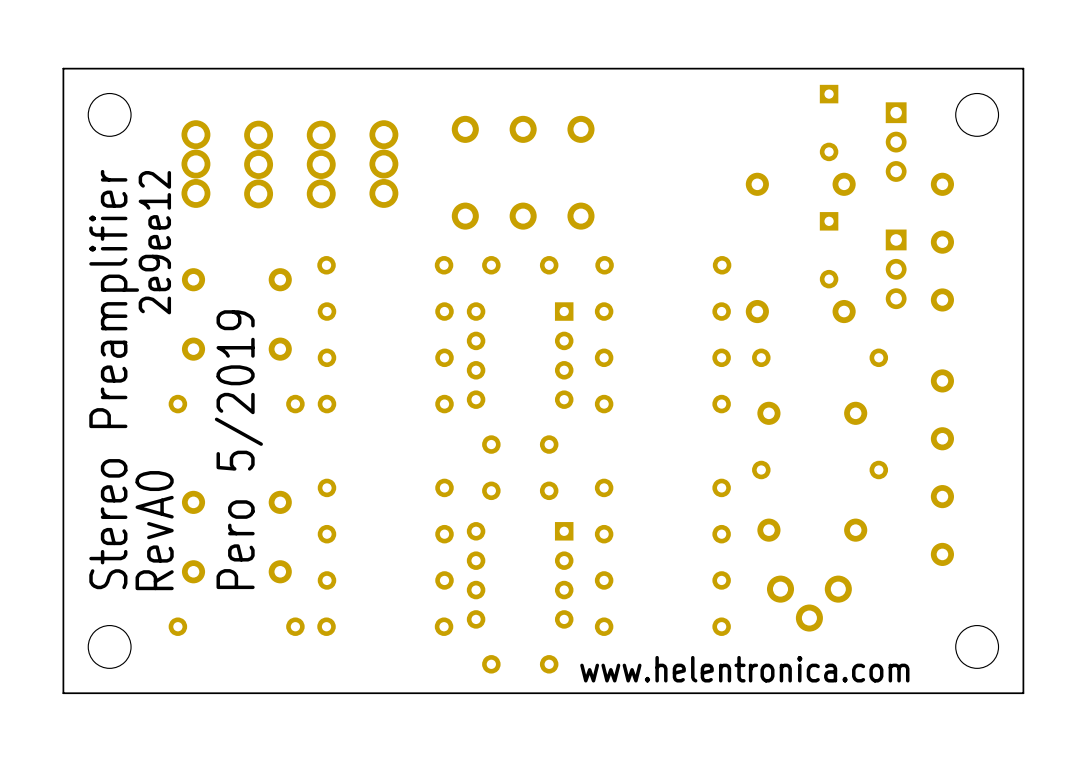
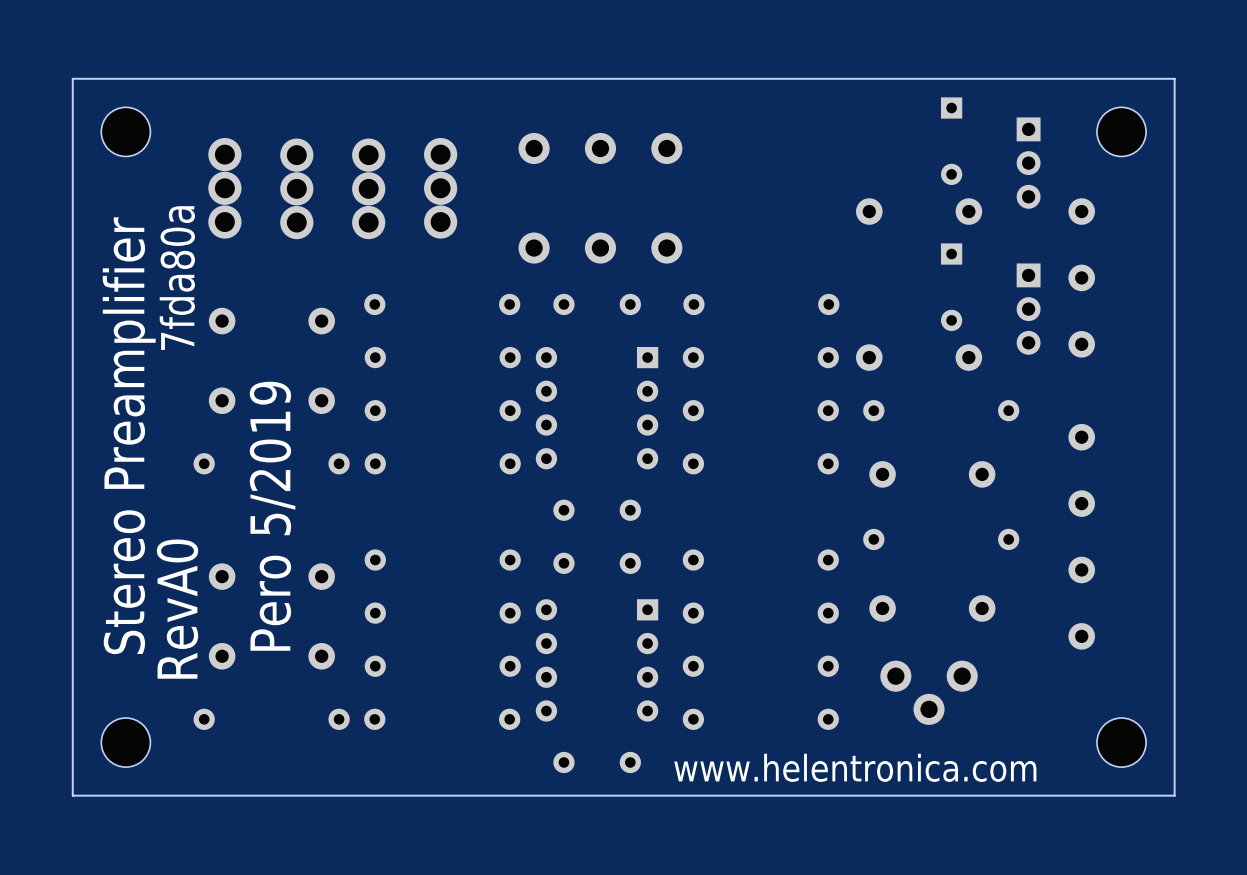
text: 2e9ee12 (154, 242) -> 7fda80a (177, 278)

